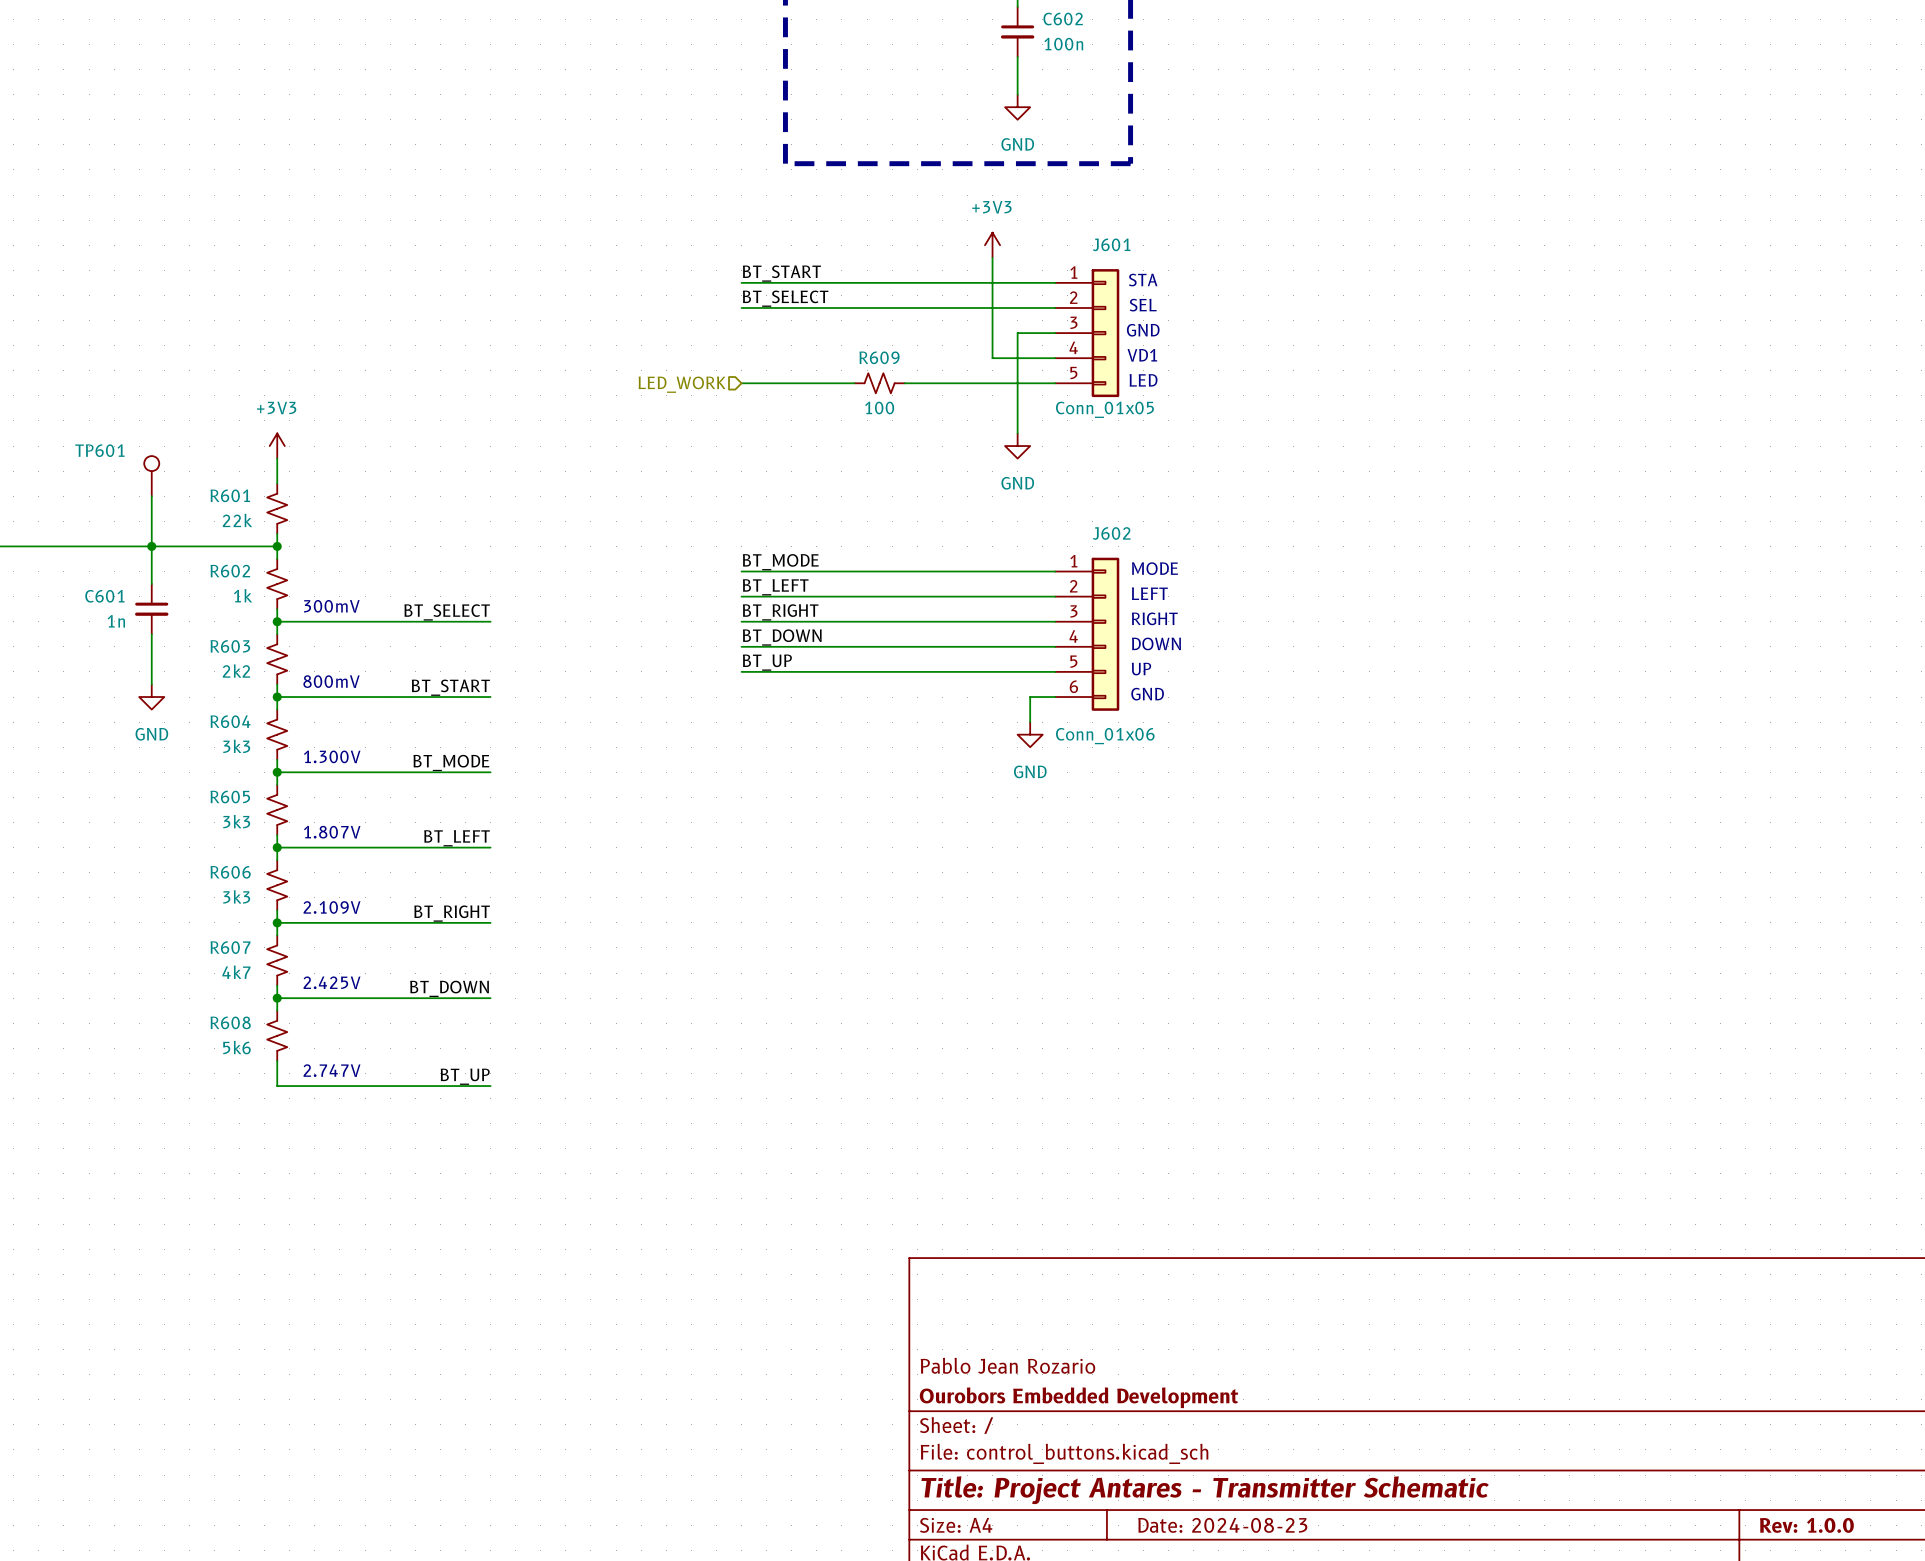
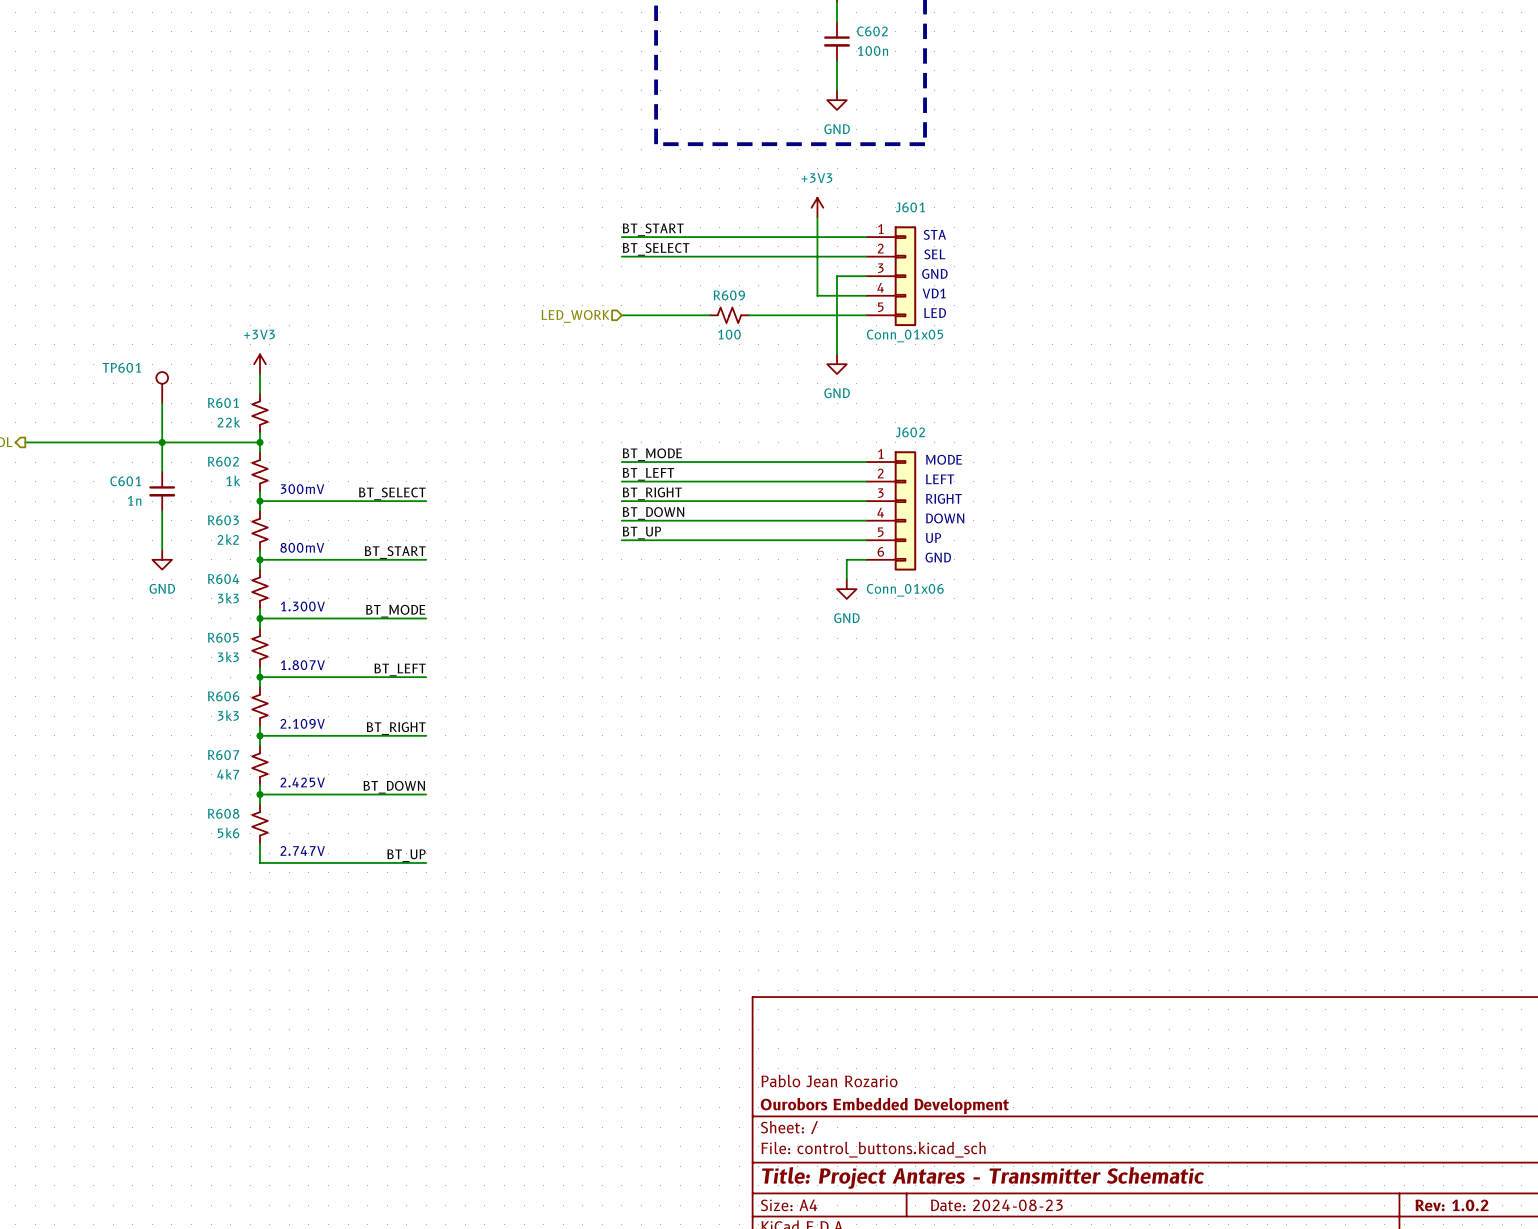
title block: Rev: 1.0.0 (1806, 1525) -> Rev: 1.0.2 (1451, 1205)

